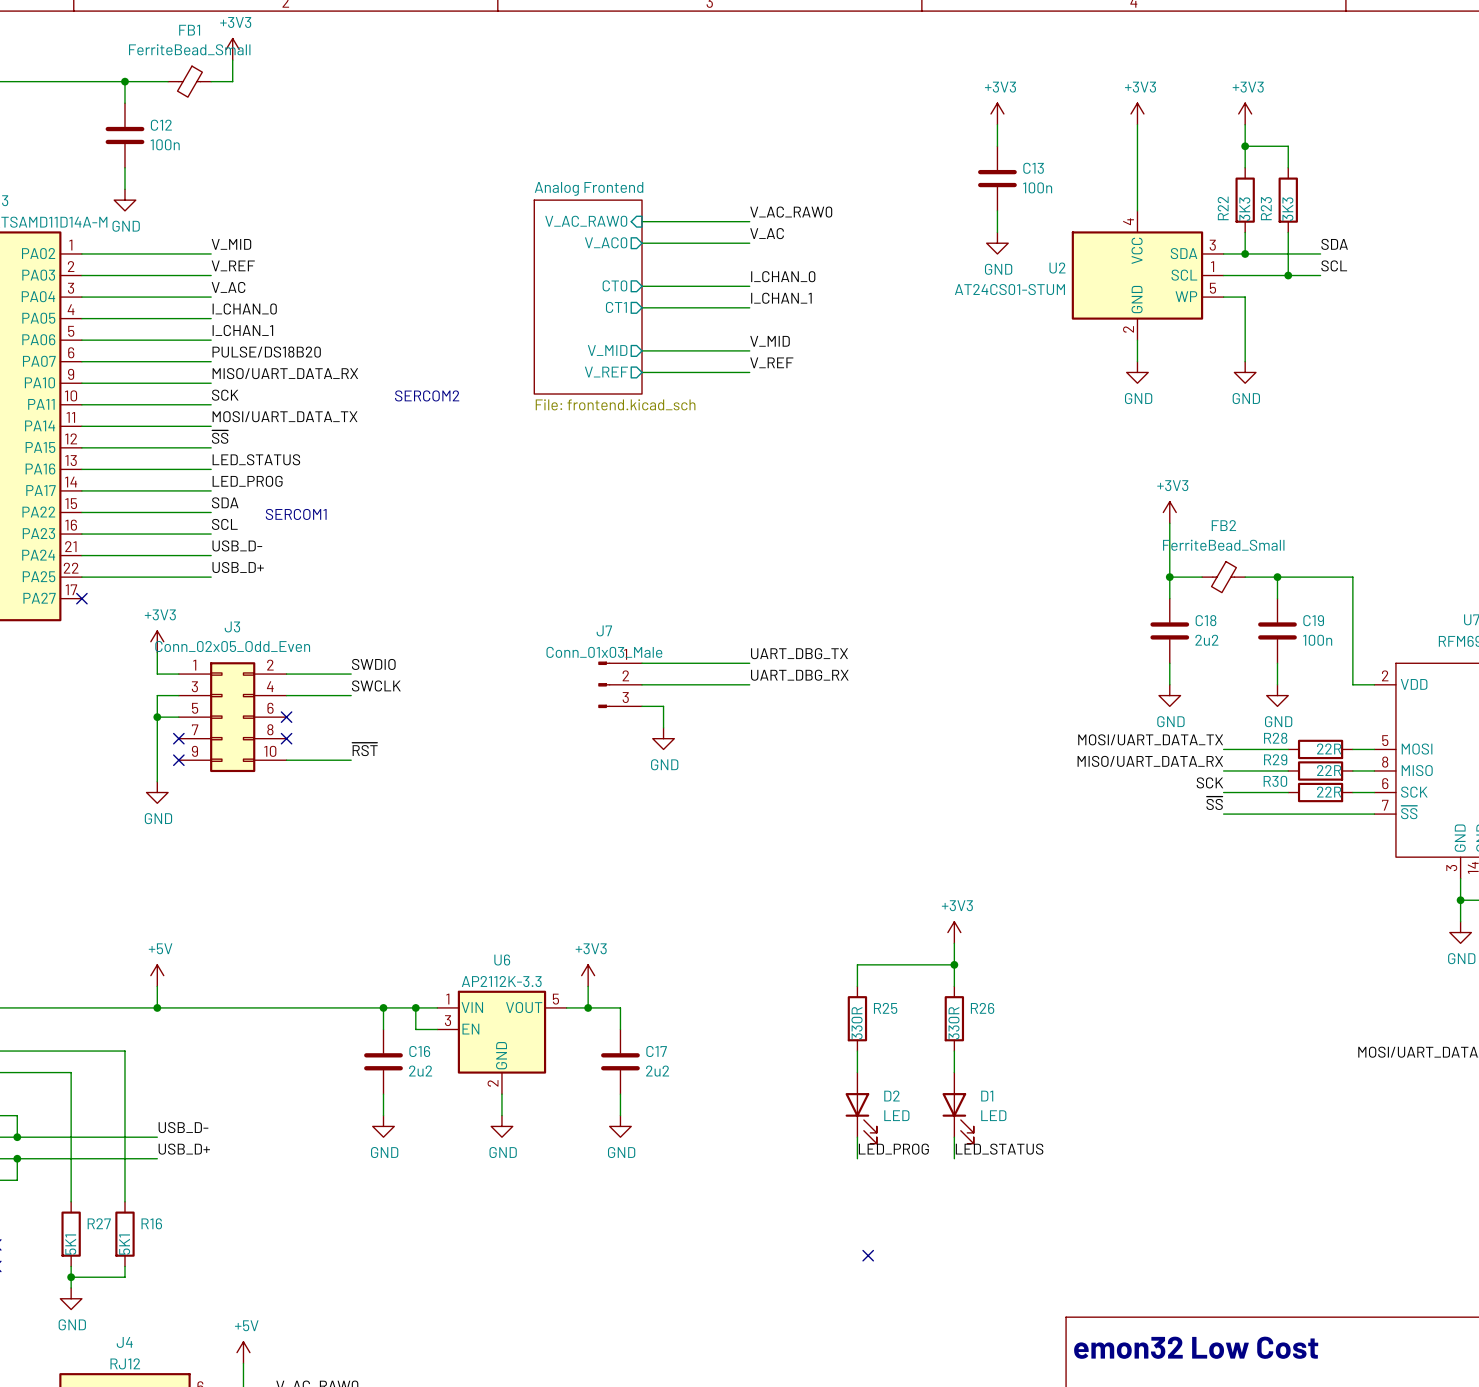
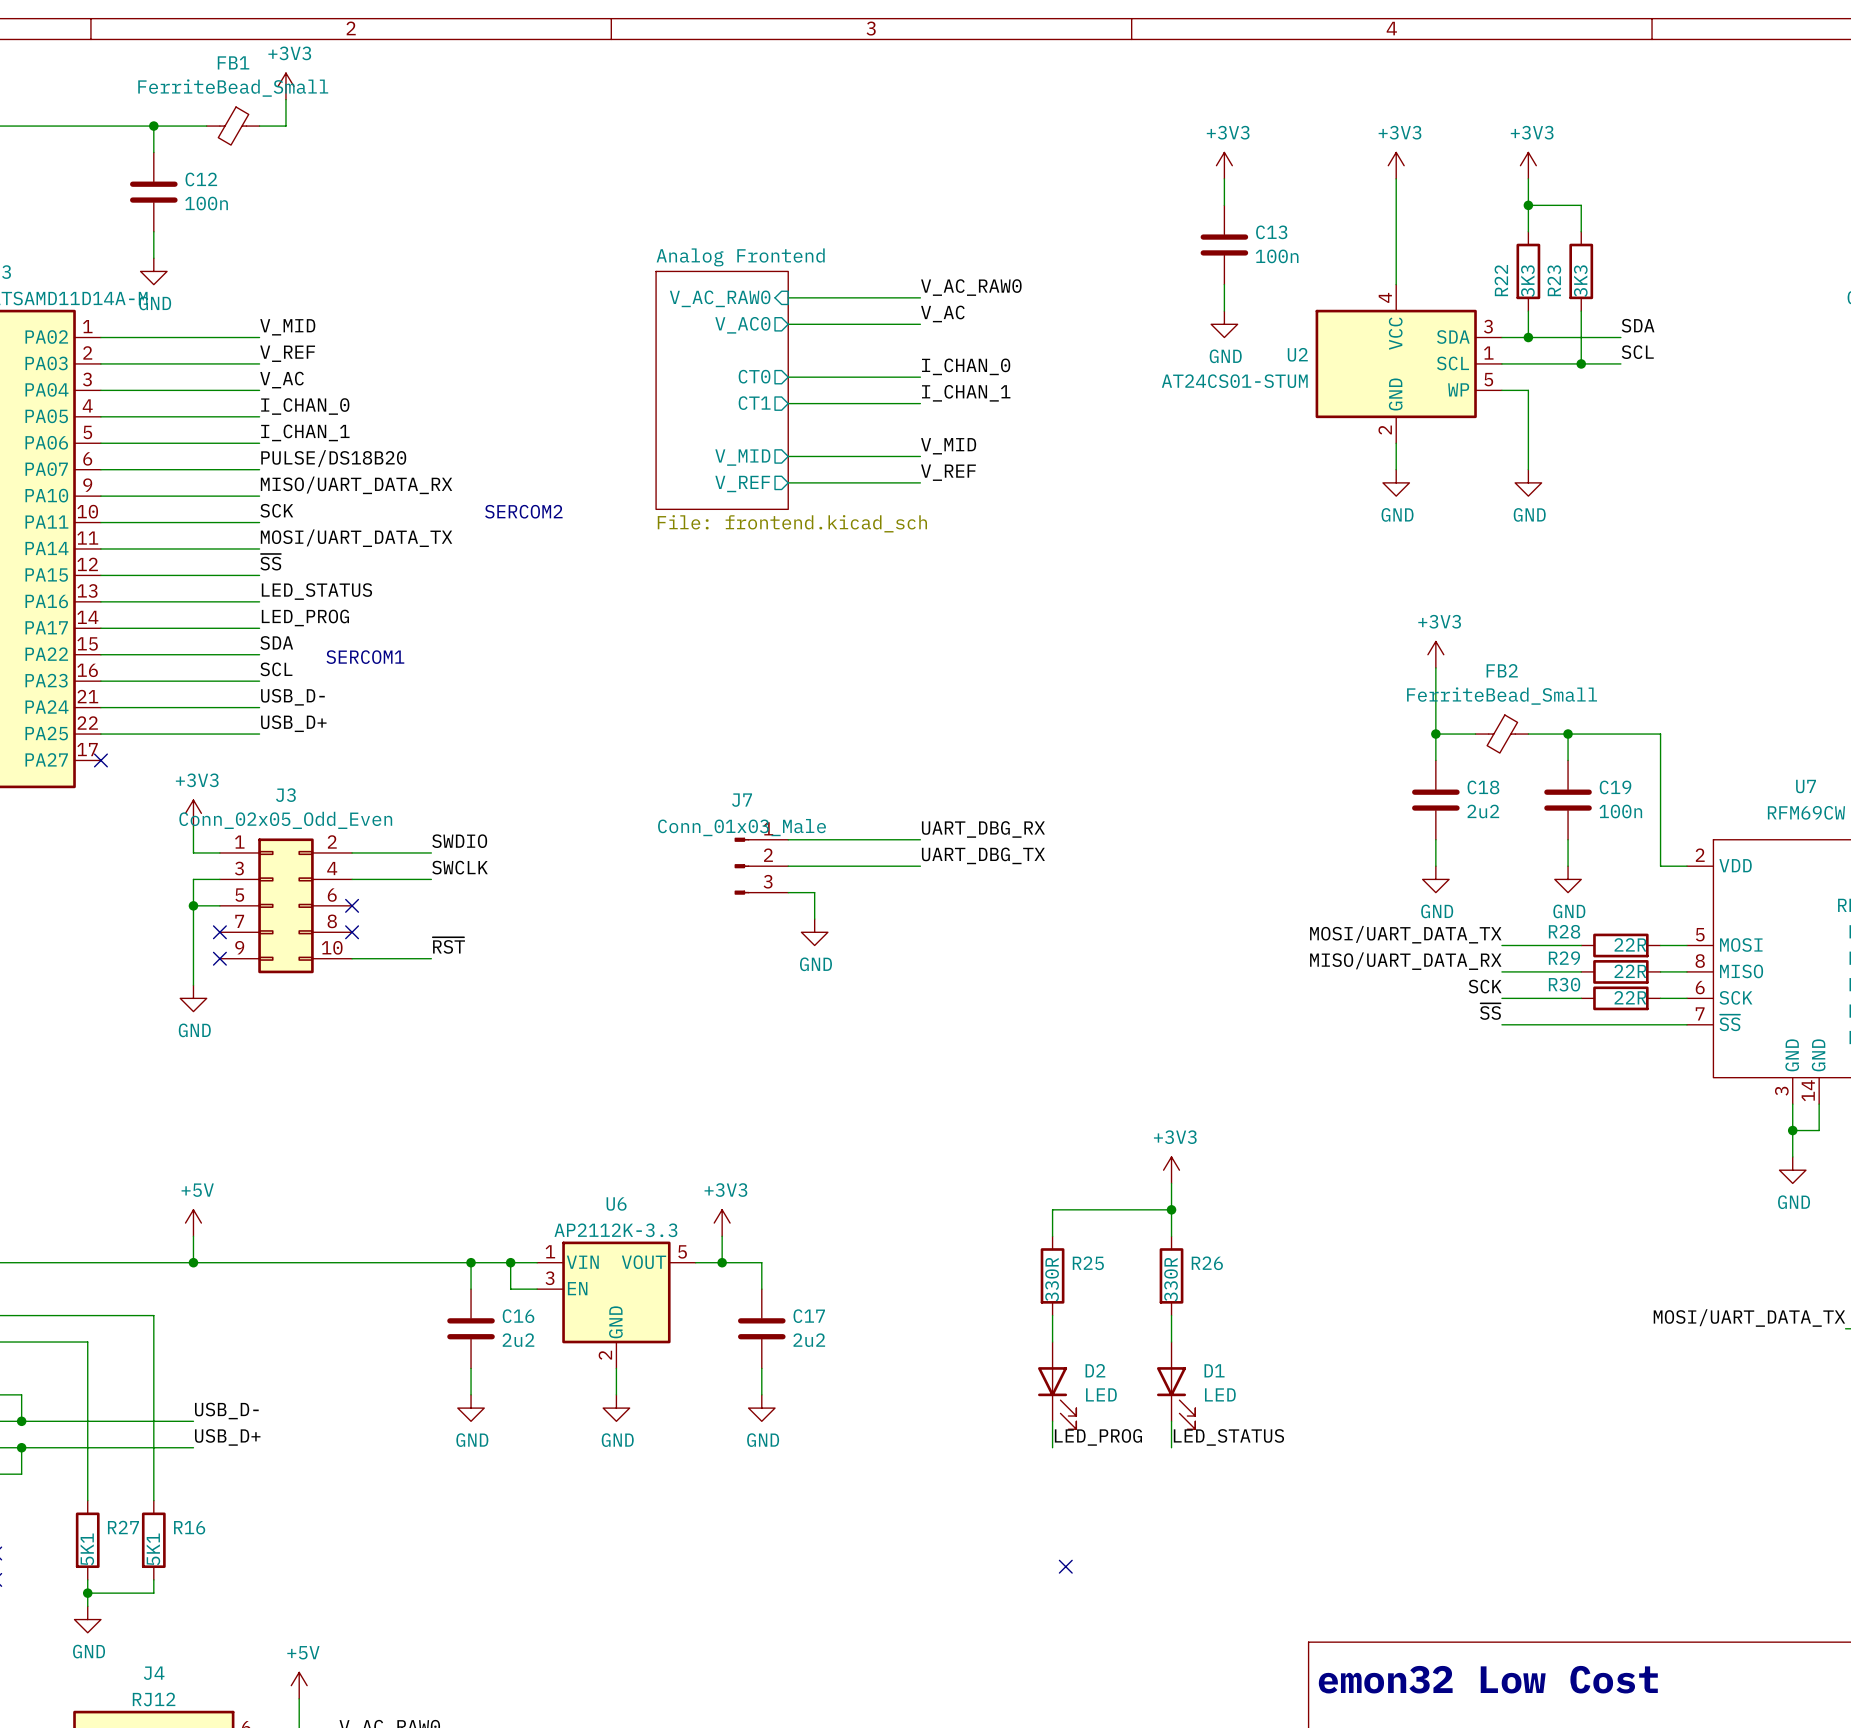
label: UART_DBG_TX (799, 653) -> UART_DBG_RX (983, 829)
label: UART_DBG_RX (799, 675) -> UART_DBG_TX (983, 855)

